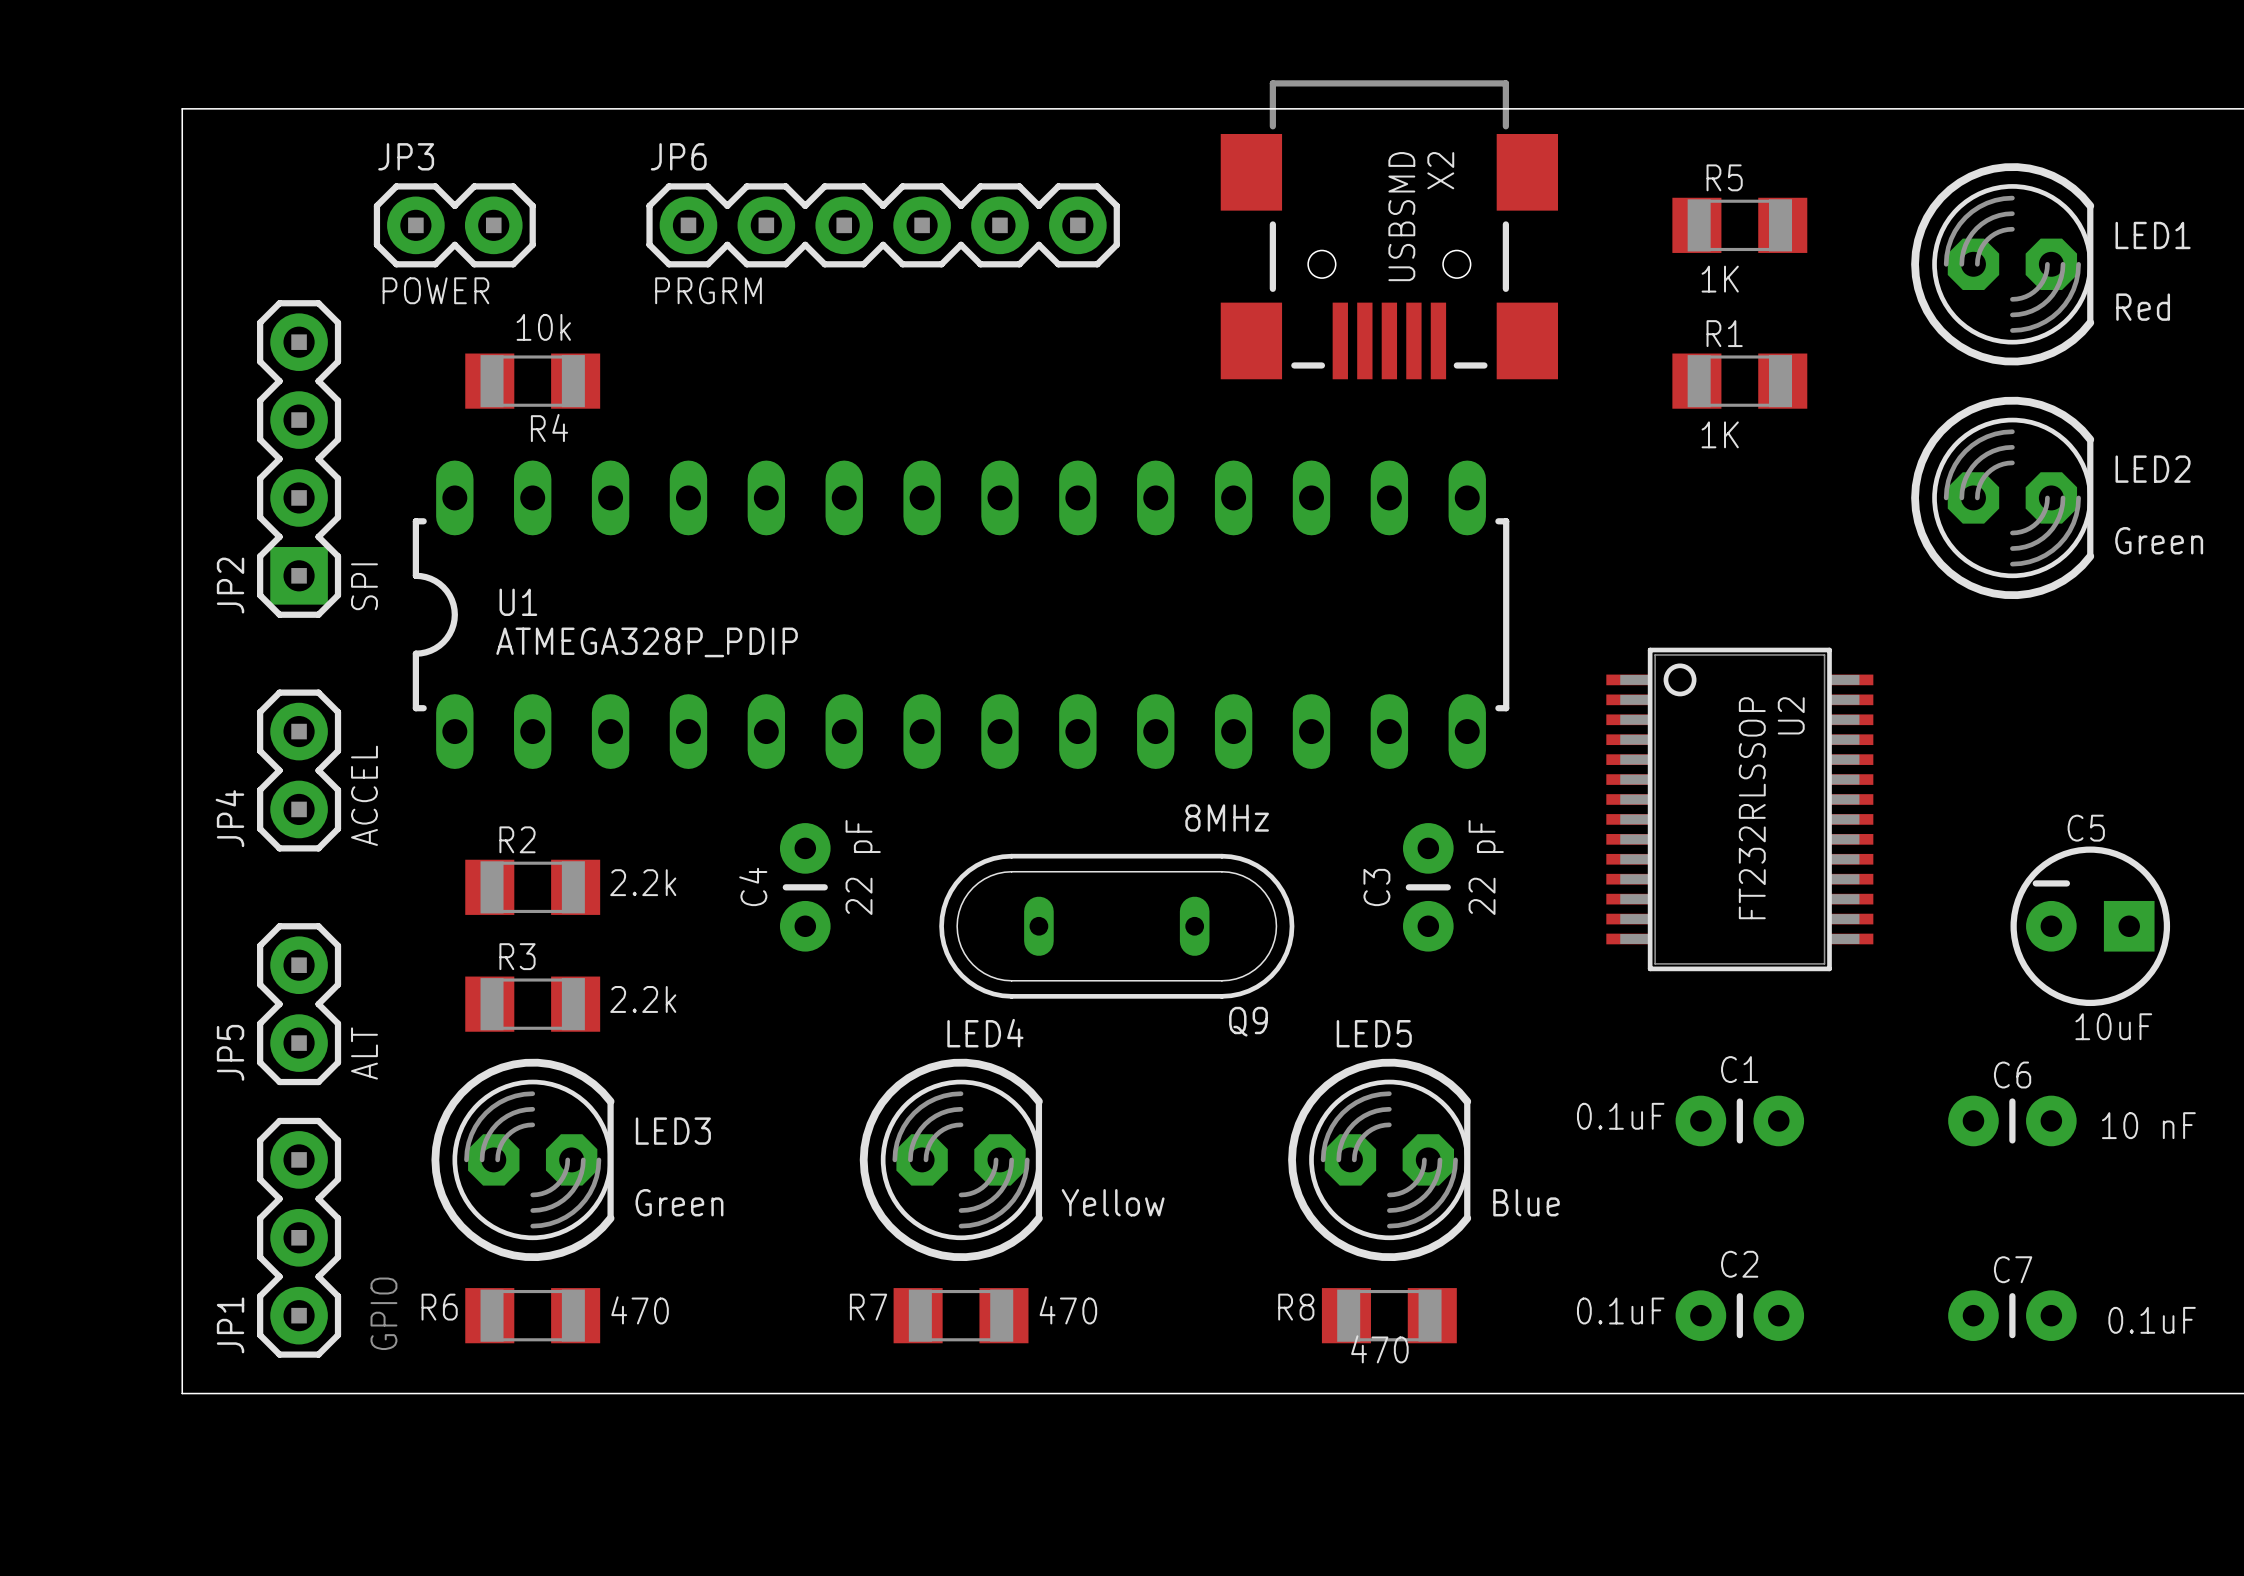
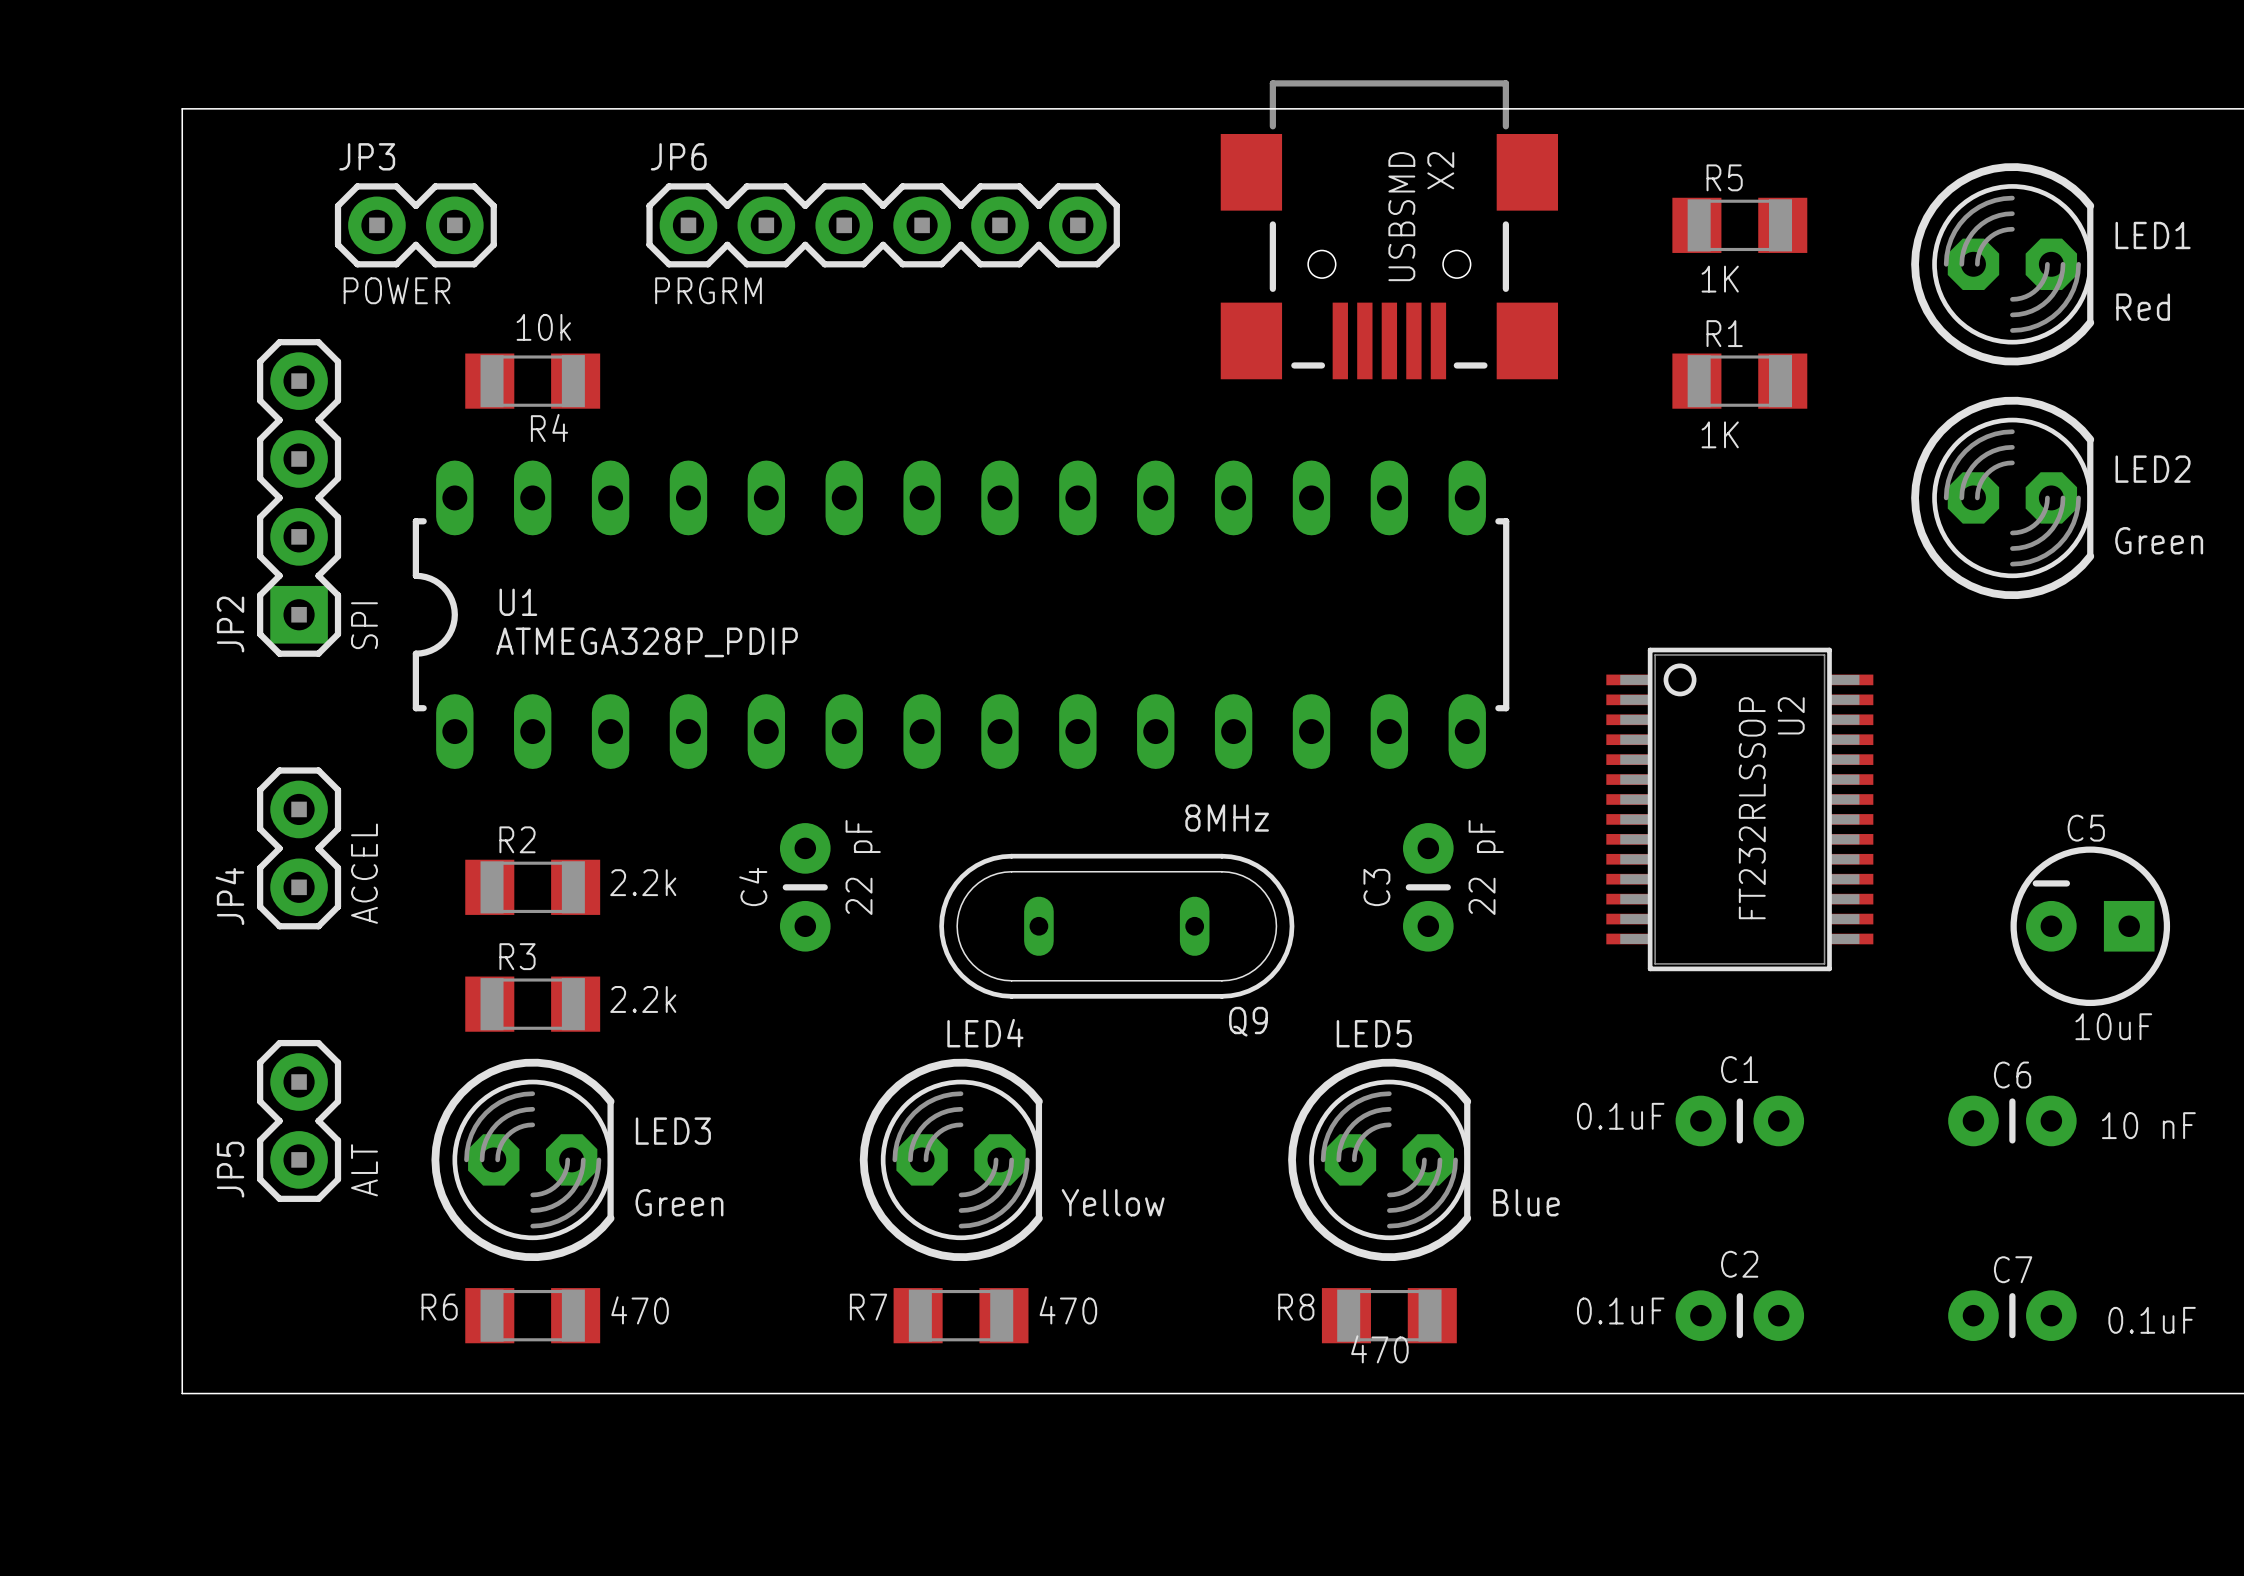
JP3 position: (454, 225) -> (415, 225)
JP2 position: (299, 458) -> (299, 497)
JP4 position: (299, 770) -> (299, 848)
JP5 position: (299, 1004) -> (299, 1120)
JP1: GPIO (299, 1237) -> none

